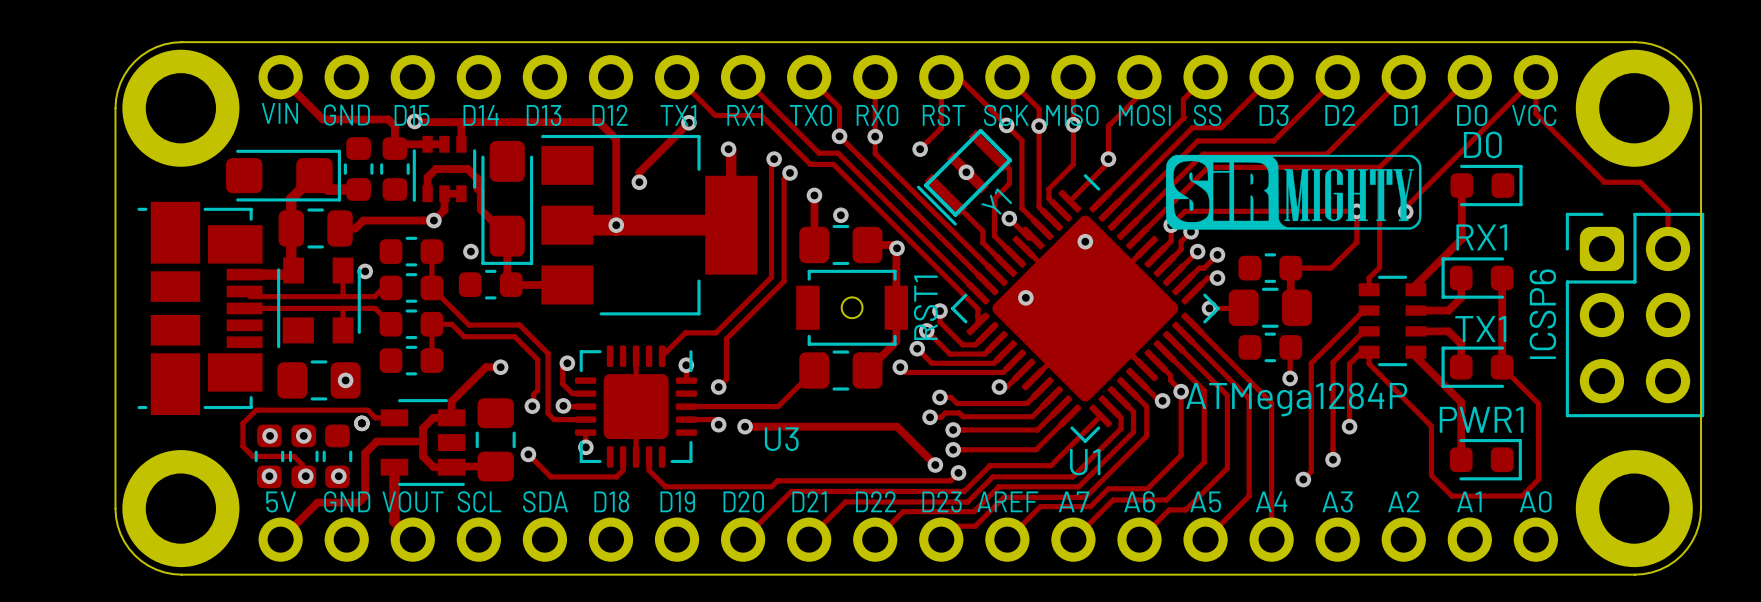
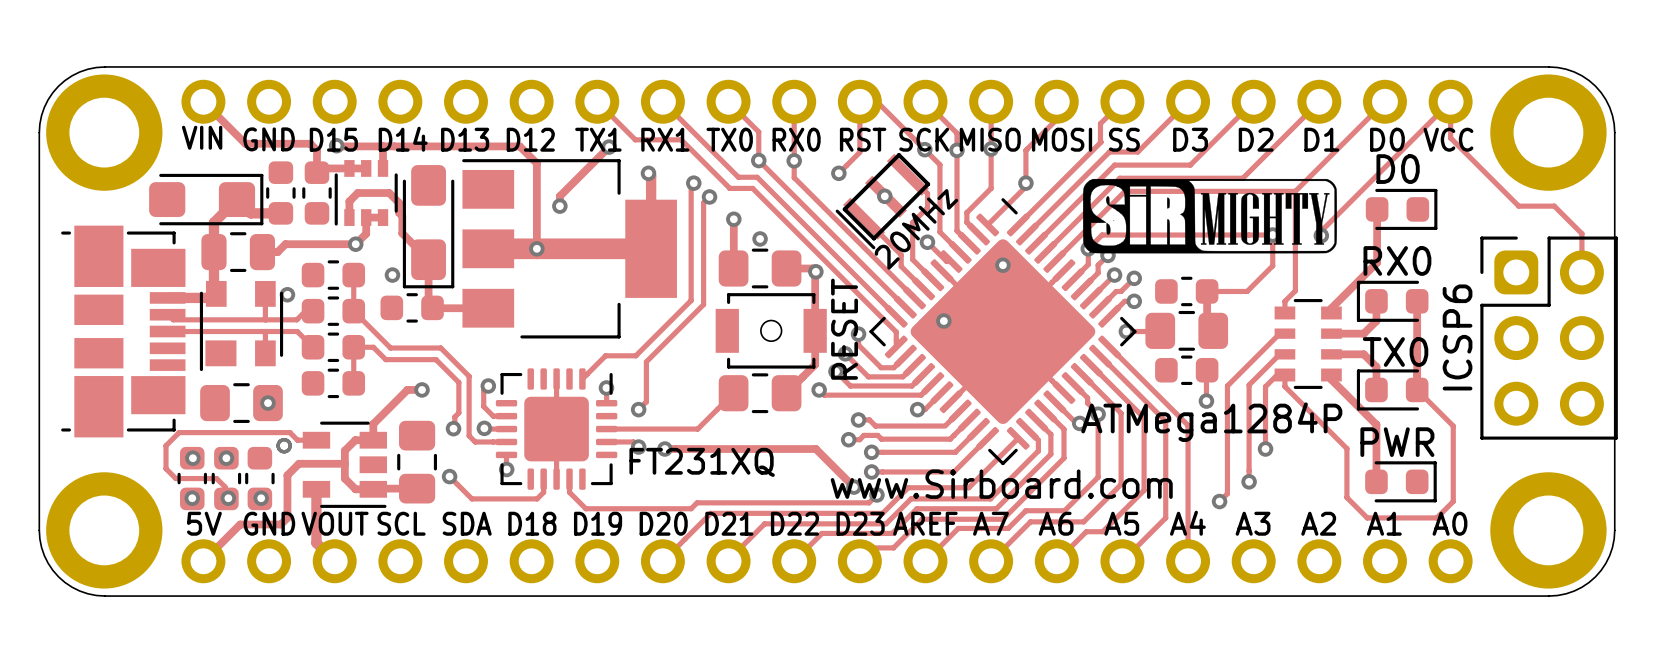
Y1 name: Y1 (996, 201) -> 20MHz (916, 229)
RX1 name: RX1 (1481, 237) -> RX0 (1397, 260)
RST1 name: RST1 (925, 307) -> RESET (844, 329)
TX1 name: TX1 (1480, 329) -> TX0 (1395, 352)
PWR1 name: PWR1 (1481, 419) -> PWR (1397, 442)
U3 name: U3 (781, 439) -> FT231XQ (702, 462)
U1 name: U1 (1085, 462) -> www.Sirboard.com (1001, 484)

